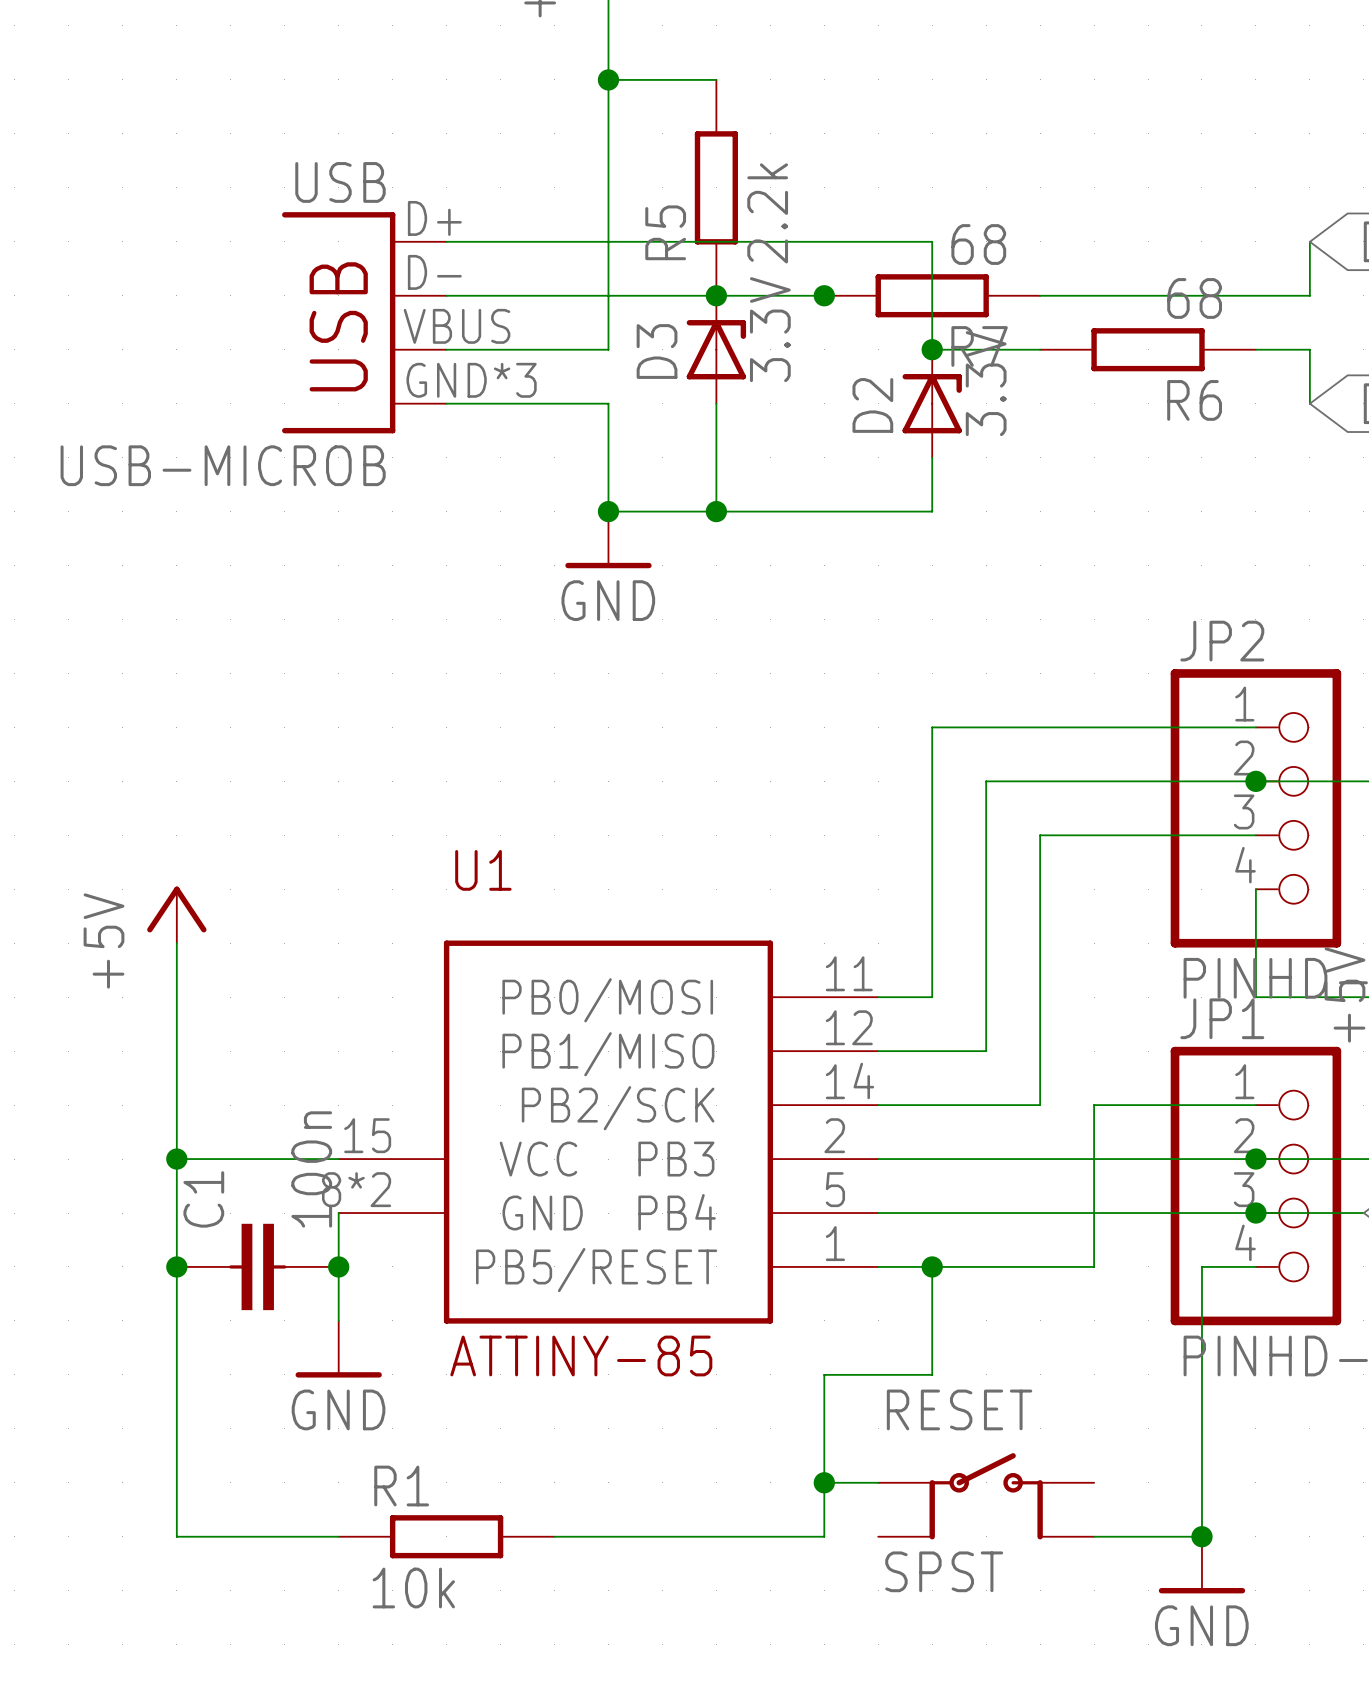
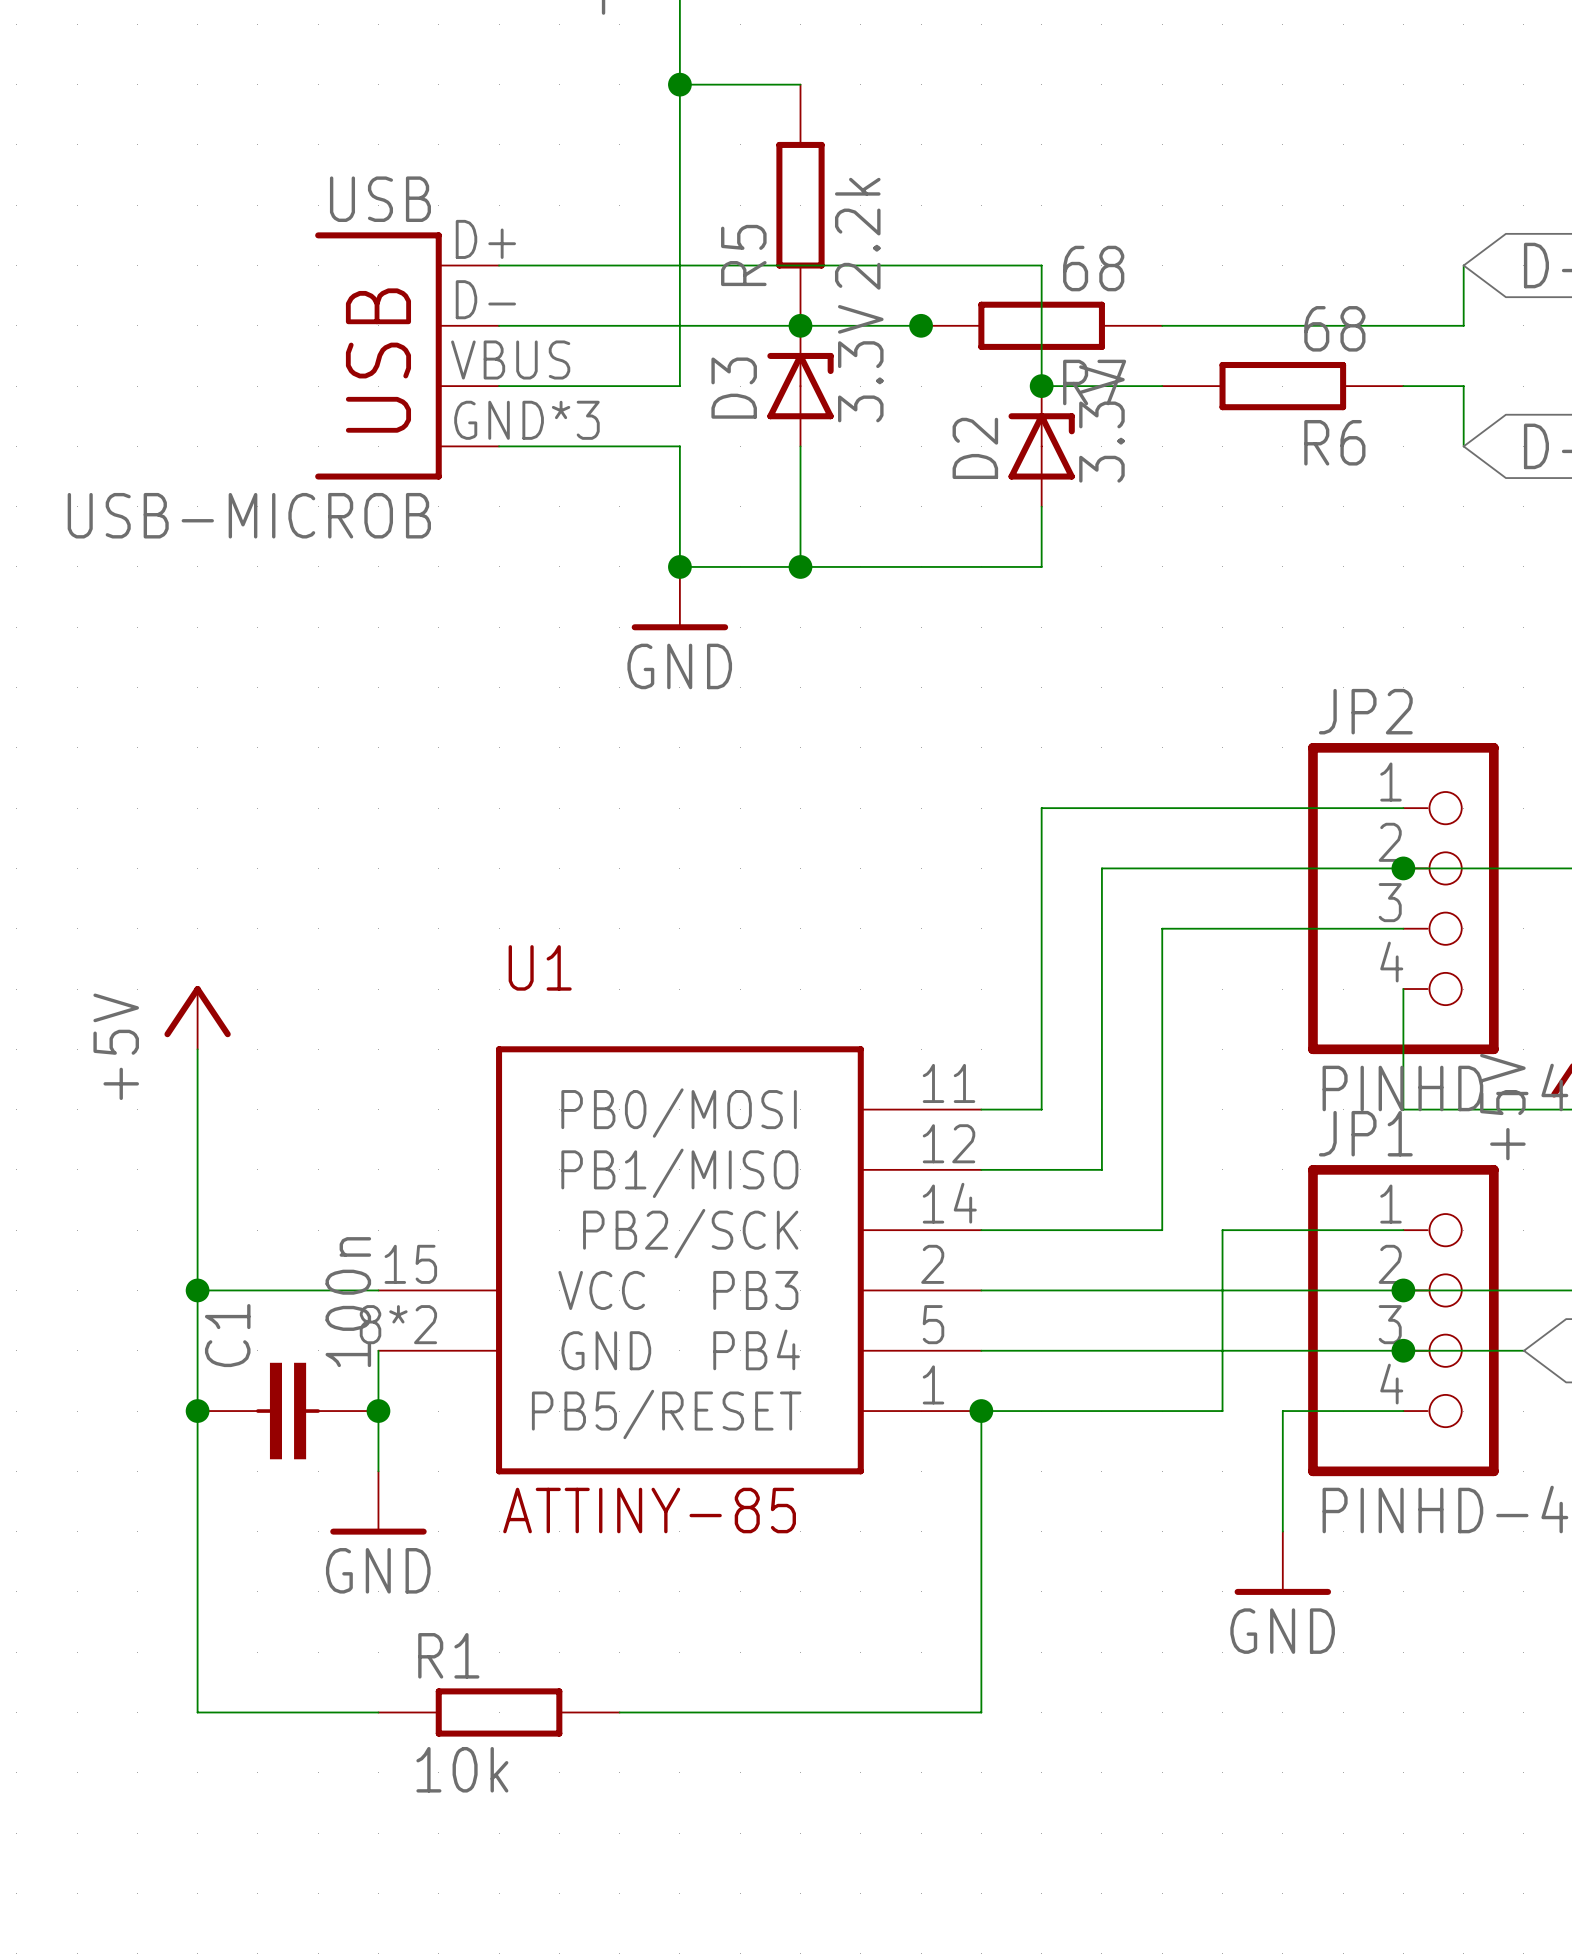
wire: (932, 1266) (932, 1374) (824, 1374) (824, 1536) -> (981, 1411) (981, 1712) (921, 1712)
junction position: (932, 1266) -> (981, 1411)
wire: (1201, 1266) (1201, 1536) (1094, 1536) -> (1343, 1411) (1282, 1411) (1282, 1531)
wire: (824, 1482) (878, 1482) -> none
junction: (824, 1482) -> none
RESET: SPST (986, 1496) -> none
junction: (1201, 1536) -> none
power symbol position: GND (1201, 1565) -> GND (1282, 1563)

